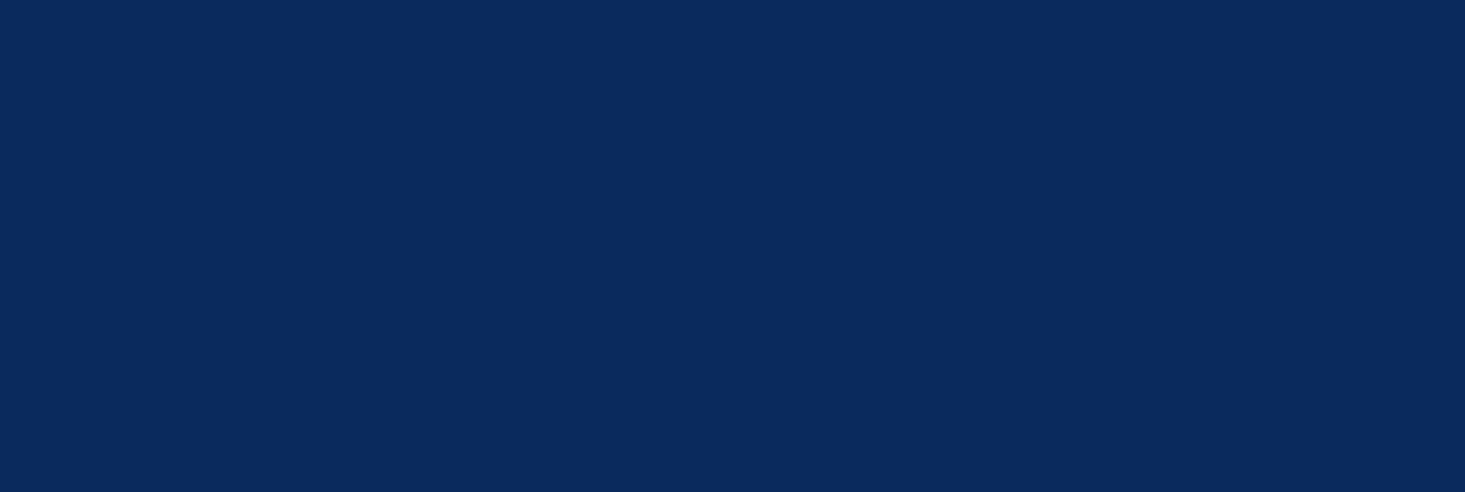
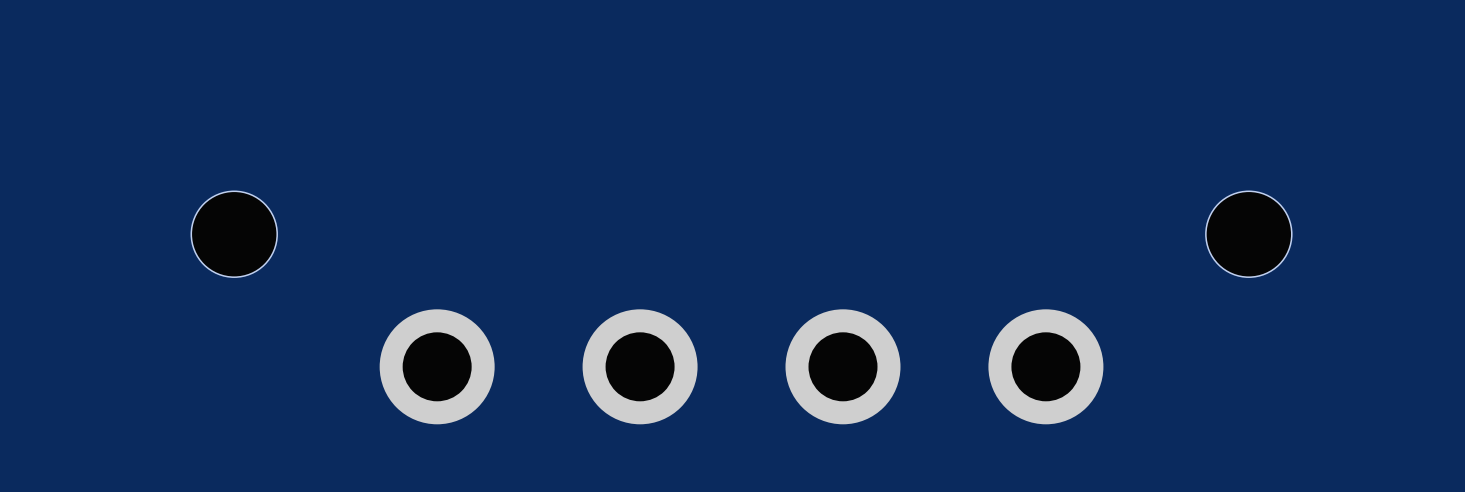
part: none -> (741, 307)

